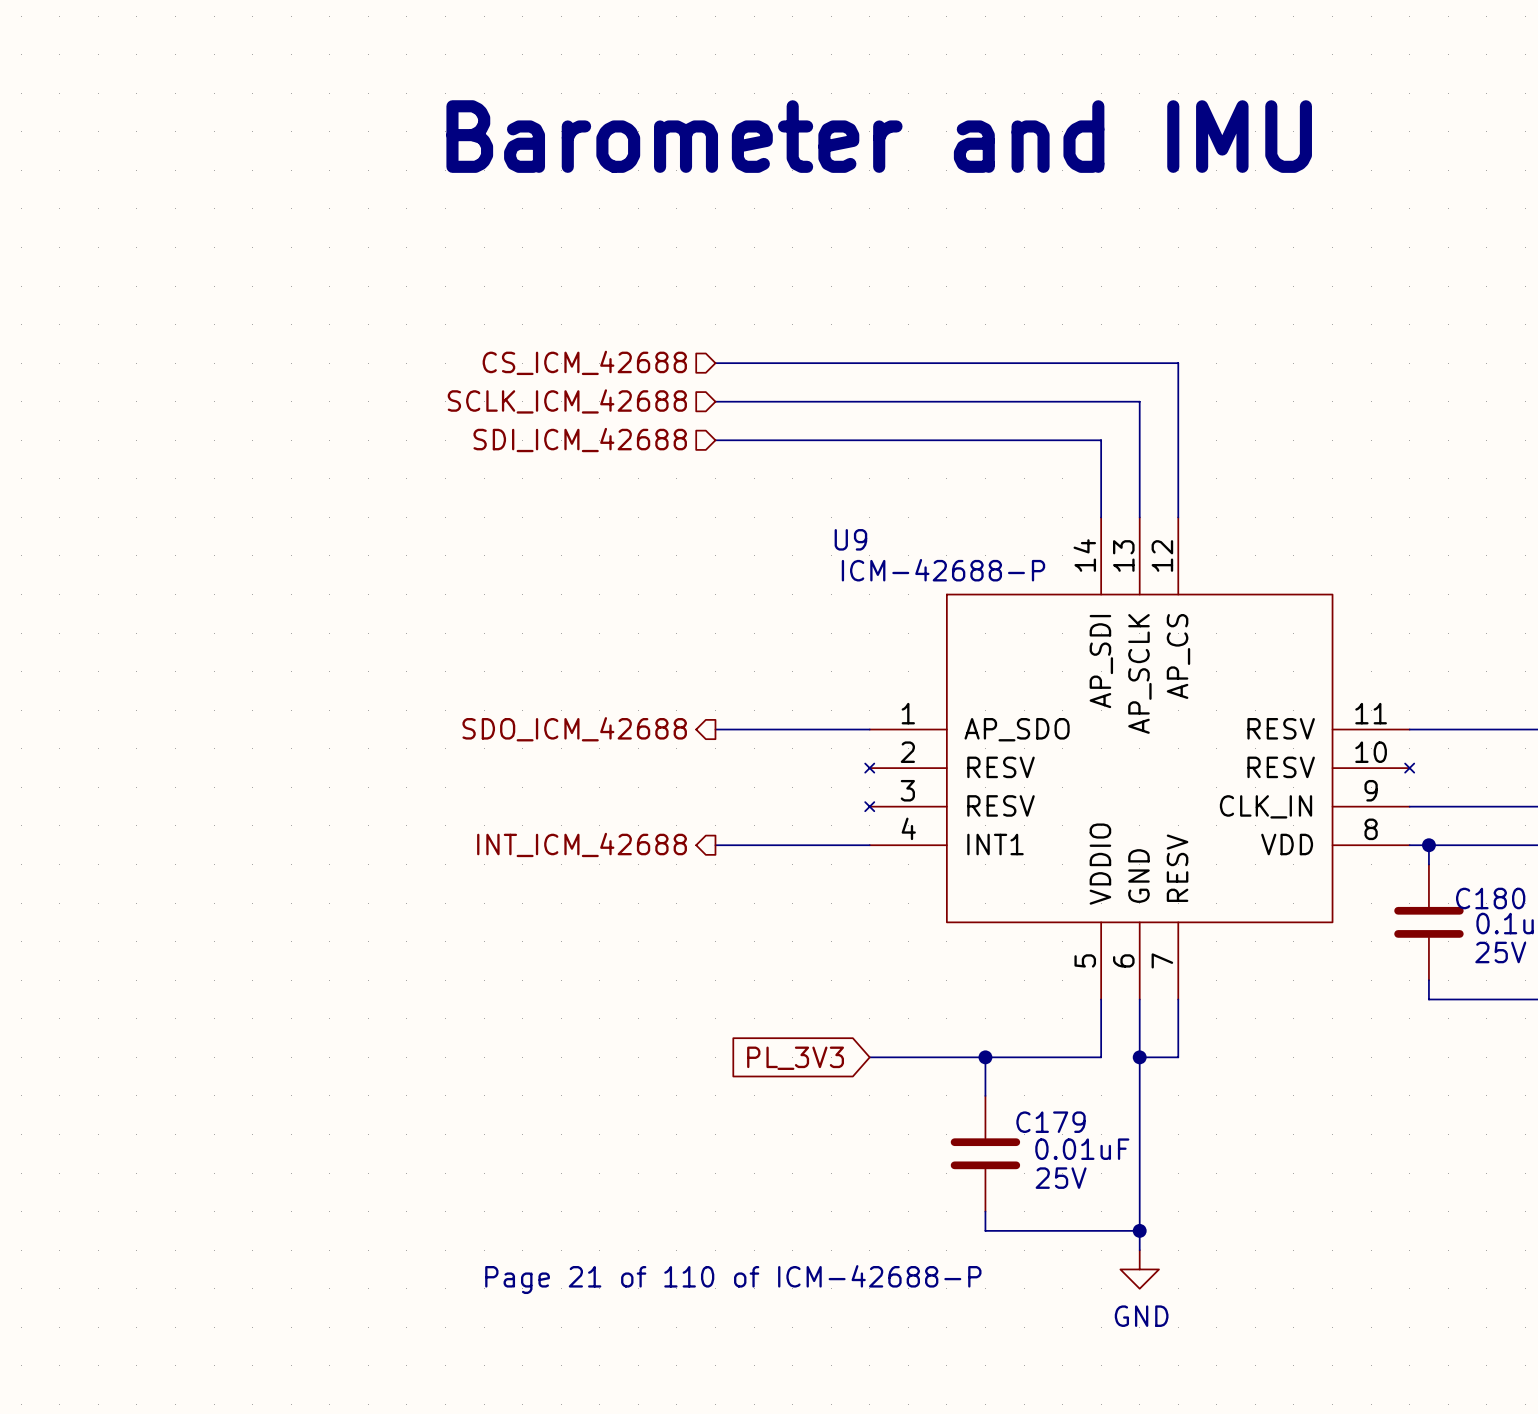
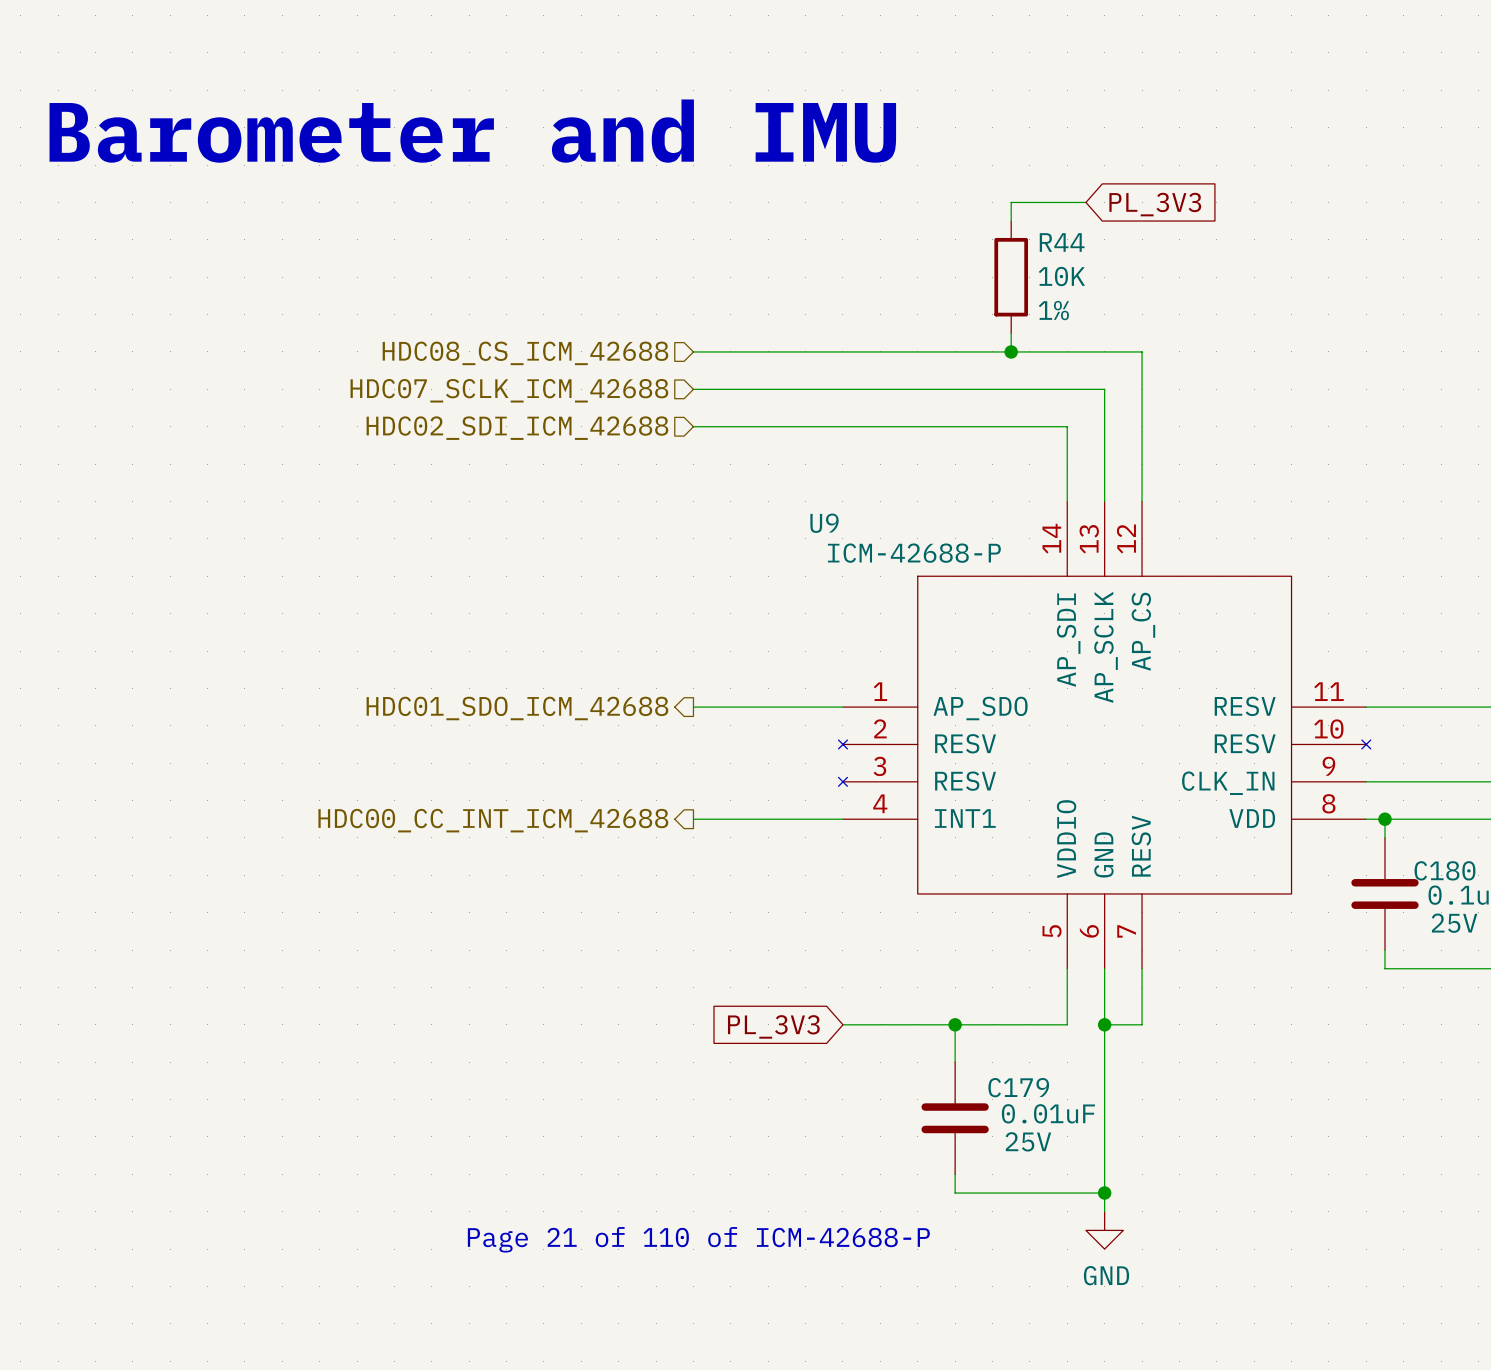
text: none -> Barometer and IMU (472, 131)
text: Barometer and IMU (879, 136) -> none
wire: none -> (1085, 202) (1011, 202) (1011, 221)
global label: none -> PL_3V3 (1155, 204)
R44: none -> 10K (1011, 277)
wire: none -> (1011, 333) (1011, 351)
hierarchical label: CS_ICM_42688 (584, 362) -> HDC08_CS_ICM_42688 (525, 353)
junction: none -> (1011, 351)
hierarchical label: SCLK_ICM_42688 (567, 401) -> HDC07_SCLK_ICM_42688 (509, 390)
hierarchical label: SDI_ICM_42688 (580, 440) -> HDC02_SDI_ICM_42688 (517, 428)
hierarchical label: SDO_ICM_42688 (574, 729) -> HDC01_SDO_ICM_42688 (517, 708)
hierarchical label: INT_ICM_42688 (582, 844) -> HDC00_CC_INT_ICM_42688 (493, 820)

